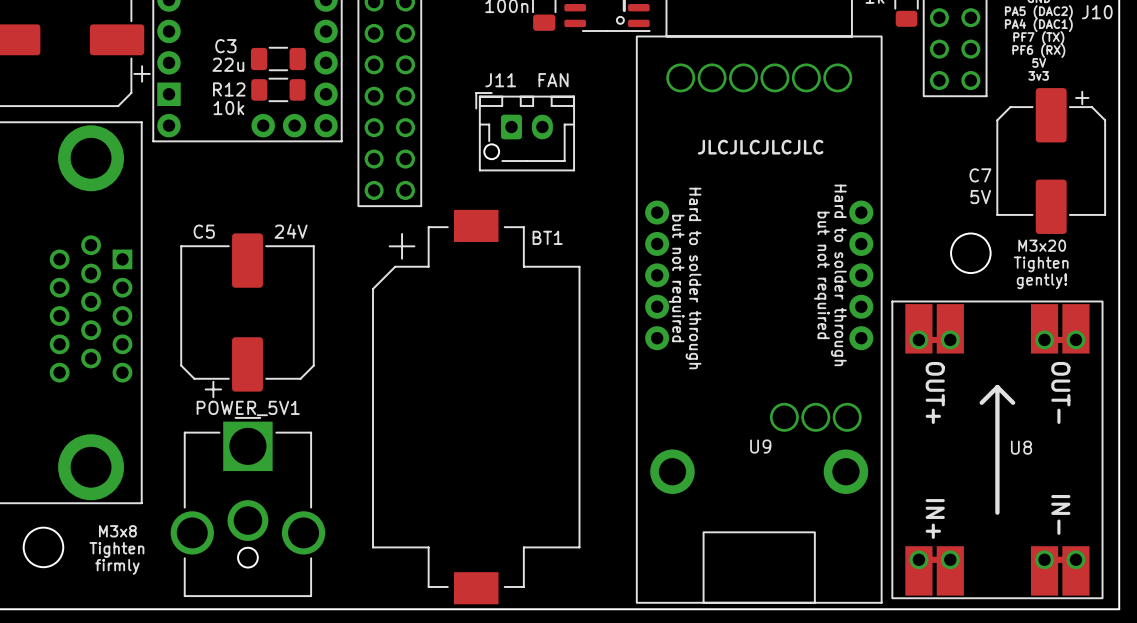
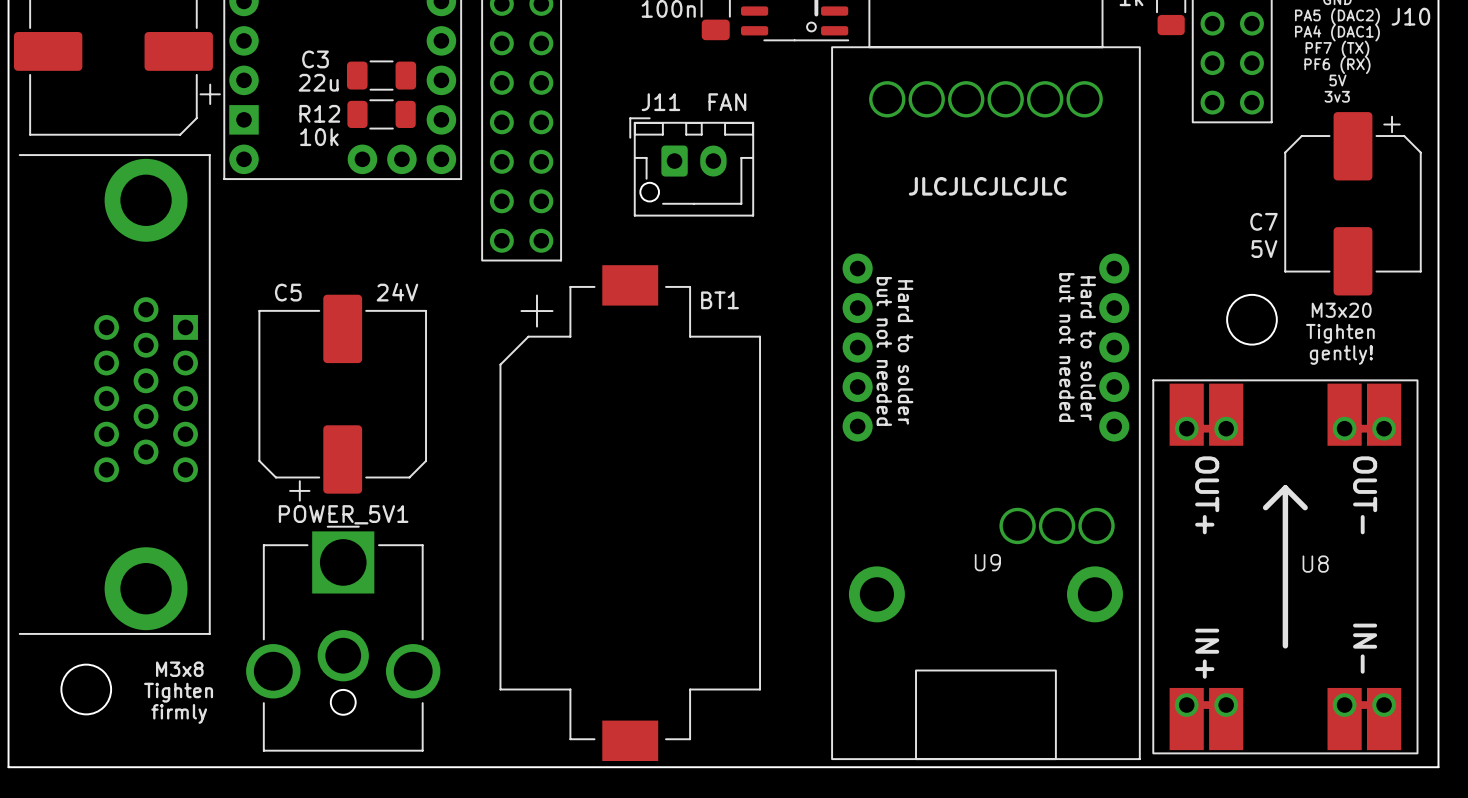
text: but not required (821, 275) -> but not needed (1066, 347)
text: Hard to solder through (838, 275) -> Hard to solder (1088, 348)
text: but not required (676, 278) -> but not needed (884, 351)
text: Hard to solder through (693, 278) -> Hard to solder (905, 352)

